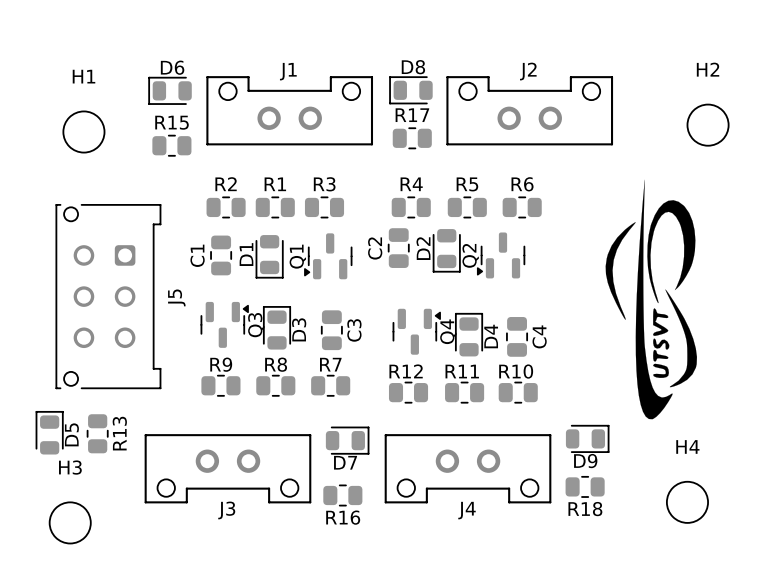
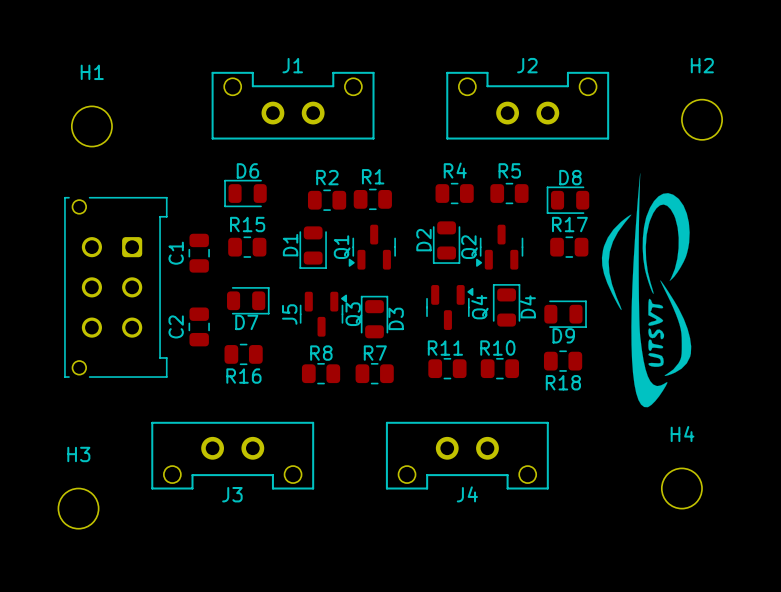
D6 position: (170, 90) -> (245, 193)
D8 position: (410, 90) -> (567, 200)
R17 position: (412, 138) -> (569, 247)
R15 position: (171, 145) -> (247, 247)
R3 name: R3 (324, 184) -> R2 (327, 177)
R2: (226, 207) -> none
R1 position: (275, 207) -> (372, 199)
R4 position: (411, 207) -> (454, 193)
R5 position: (467, 207) -> (509, 193)
R6: (522, 207) -> none
C2 position: (398, 248) -> (199, 326)
C1 position: (221, 255) -> (199, 253)
D1 position: (269, 256) -> (313, 247)
Q1 position: (328, 256) -> (372, 247)
J5 name position: J5 (176, 297) -> J5 (289, 314)
Q3 position: (224, 324) -> (323, 314)
D3 position: (277, 327) -> (374, 317)
C3: (331, 330) -> none
Q4 position: (416, 331) -> (449, 307)
D4 position: (469, 334) -> (506, 305)
C4: (517, 336) -> none
R9: (220, 385) -> none
R8 position: (275, 385) -> (321, 373)
R7 position: (330, 385) -> (374, 373)
R12: (408, 392) -> none
R11 position: (464, 392) -> (447, 368)
R10 position: (518, 392) -> (499, 368)
D5: (49, 432) -> none
R13: (97, 433) -> none
D9 position: (587, 438) -> (565, 314)
D7 position: (347, 440) -> (248, 300)
R18 position: (585, 486) -> (563, 361)
R16 position: (342, 495) -> (243, 354)

